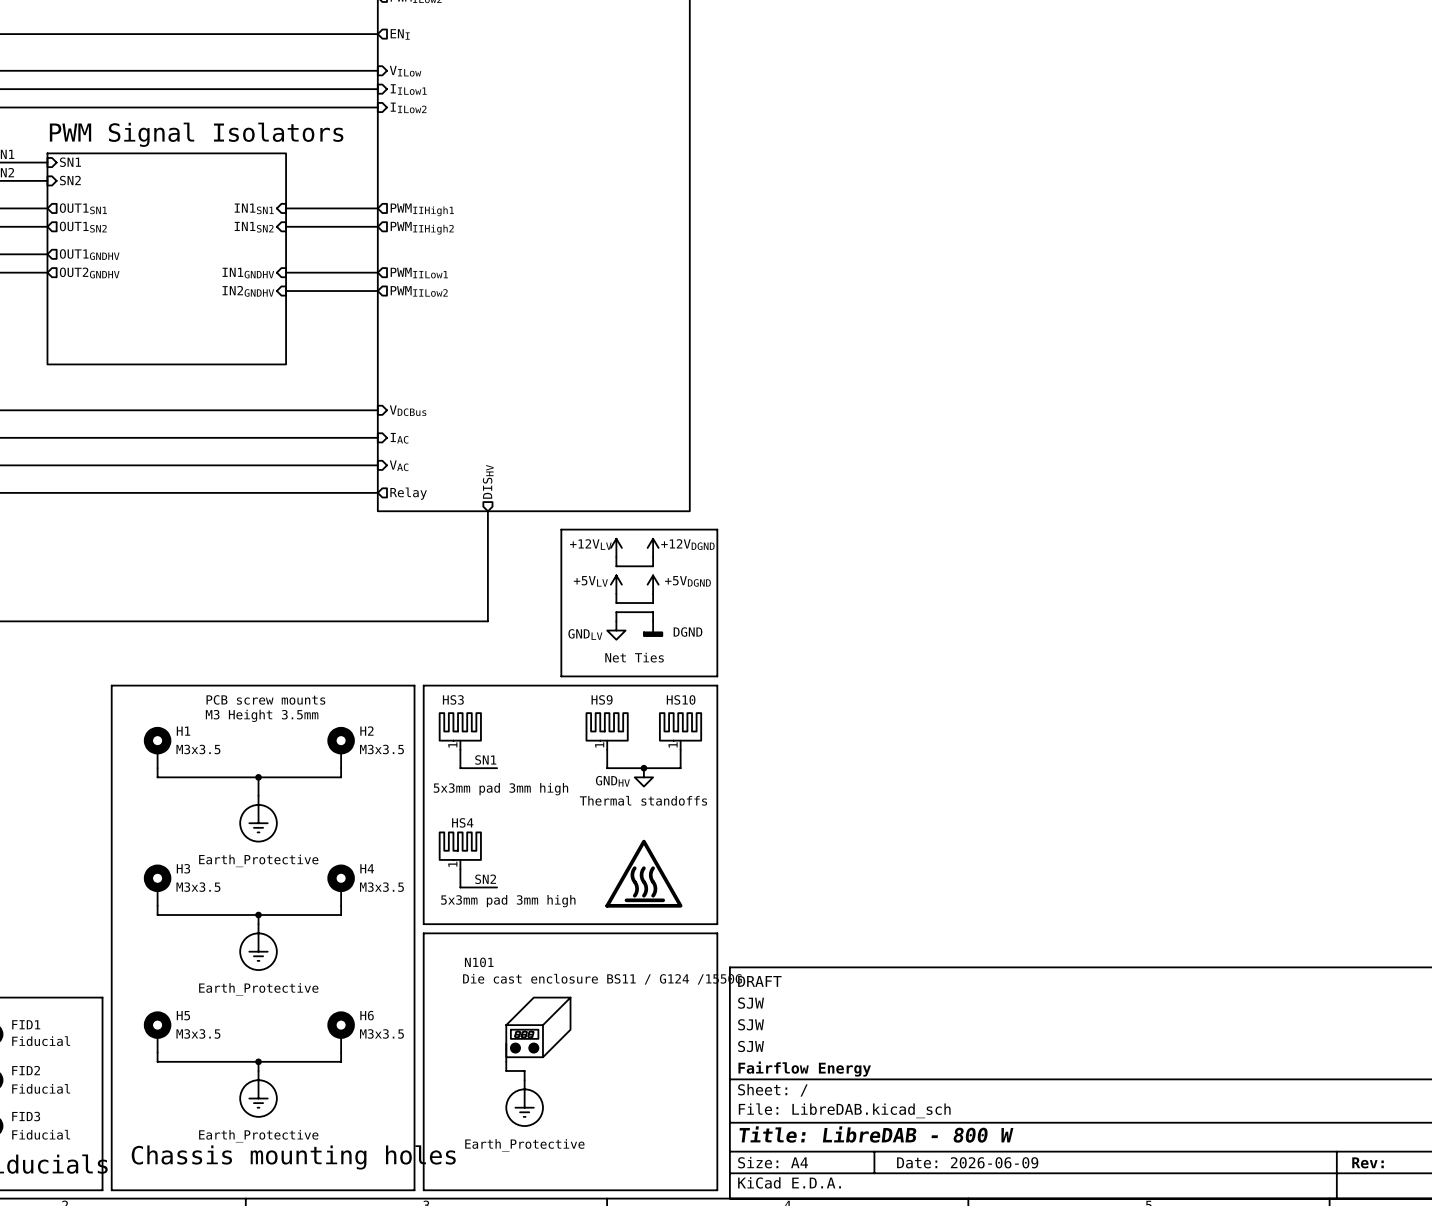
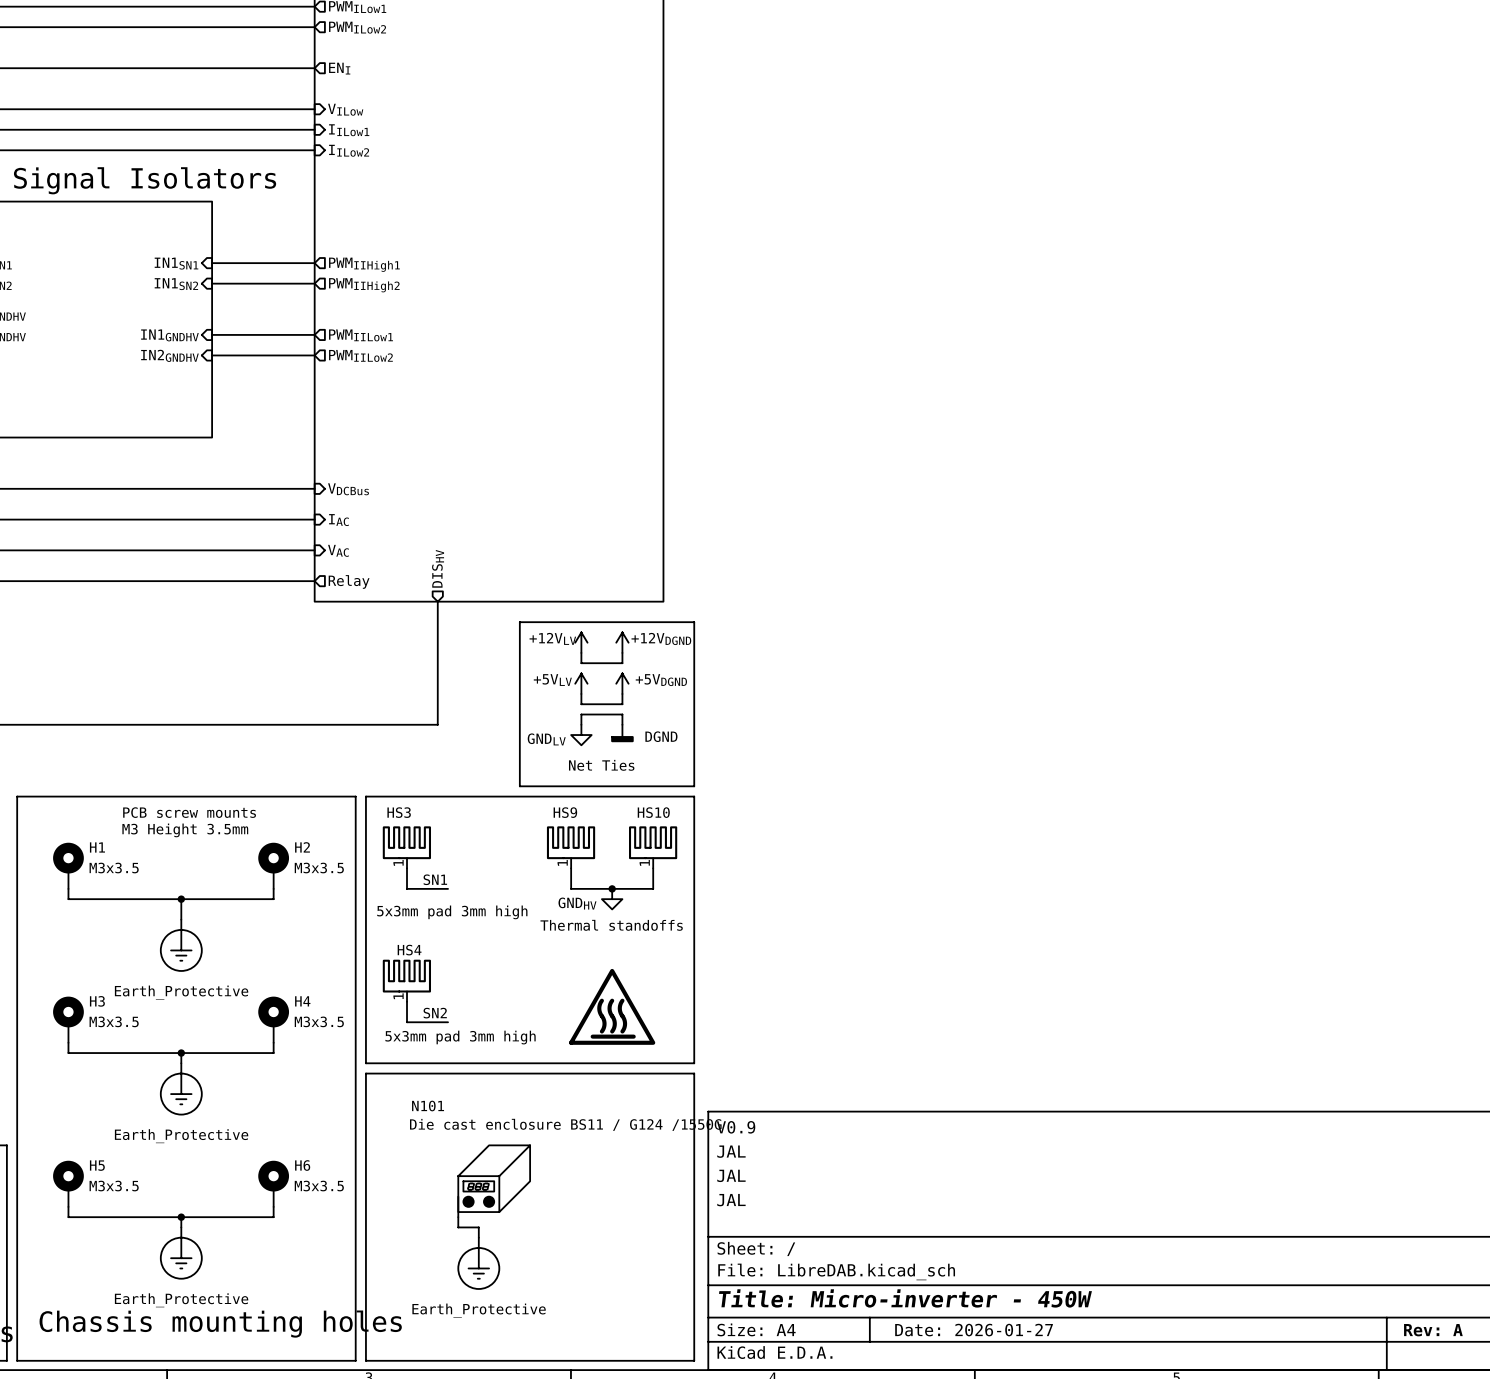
title block: DRAFT (759, 981) -> V0.9 (736, 1127)
title block: SJW (751, 1003) -> JAL (731, 1151)
title block: SJW (751, 1024) -> JAL (731, 1175)
title block: SJW (751, 1046) -> JAL (731, 1200)
title block: Fairflow Energy (804, 1069) -> none
title block: Title: LibreDAB - 800 W (876, 1134) -> Title: Micro-inverter - 450W (905, 1298)
title block: Date: 2026-06-09 (967, 1162) -> Date: 2026-01-27 (974, 1330)
title block: Rev: (1368, 1162) -> Rev: A (1433, 1330)

